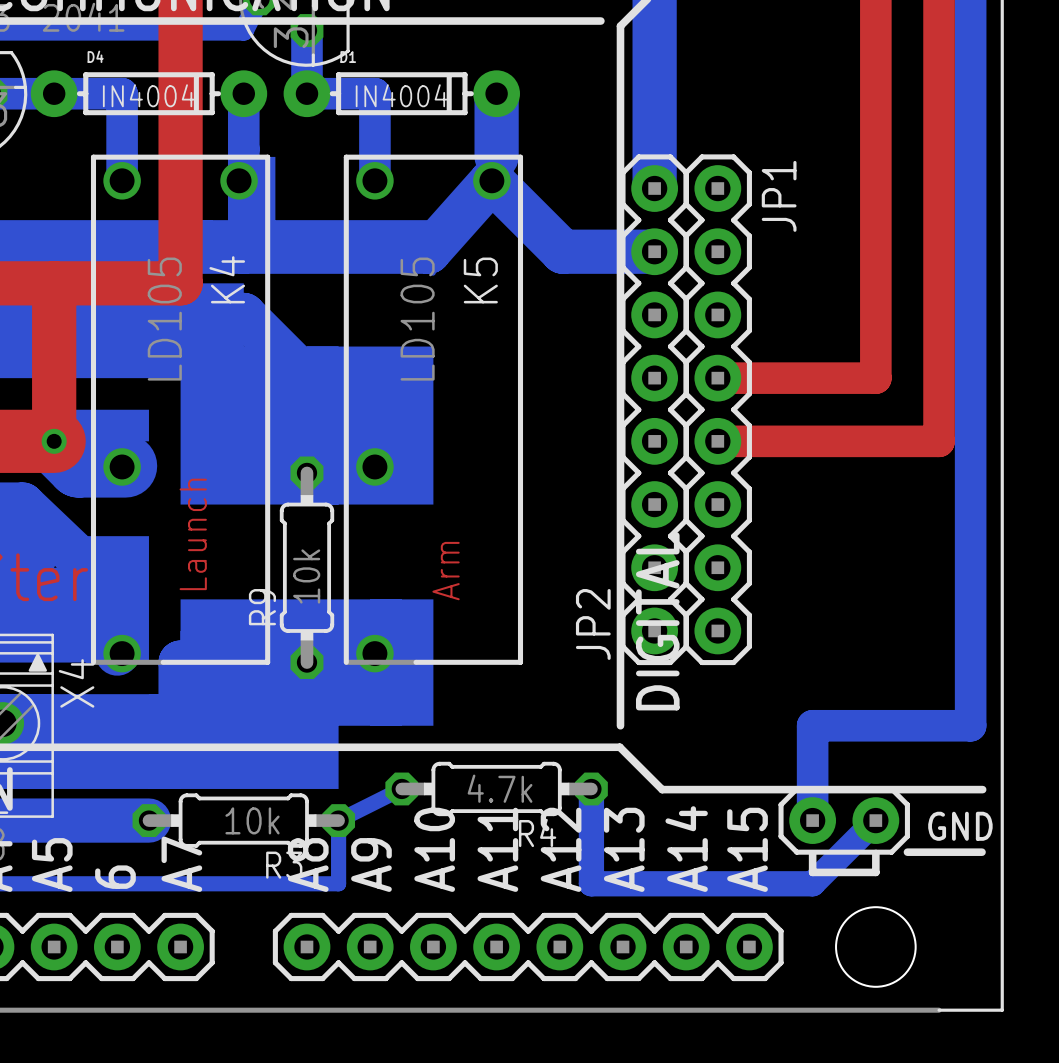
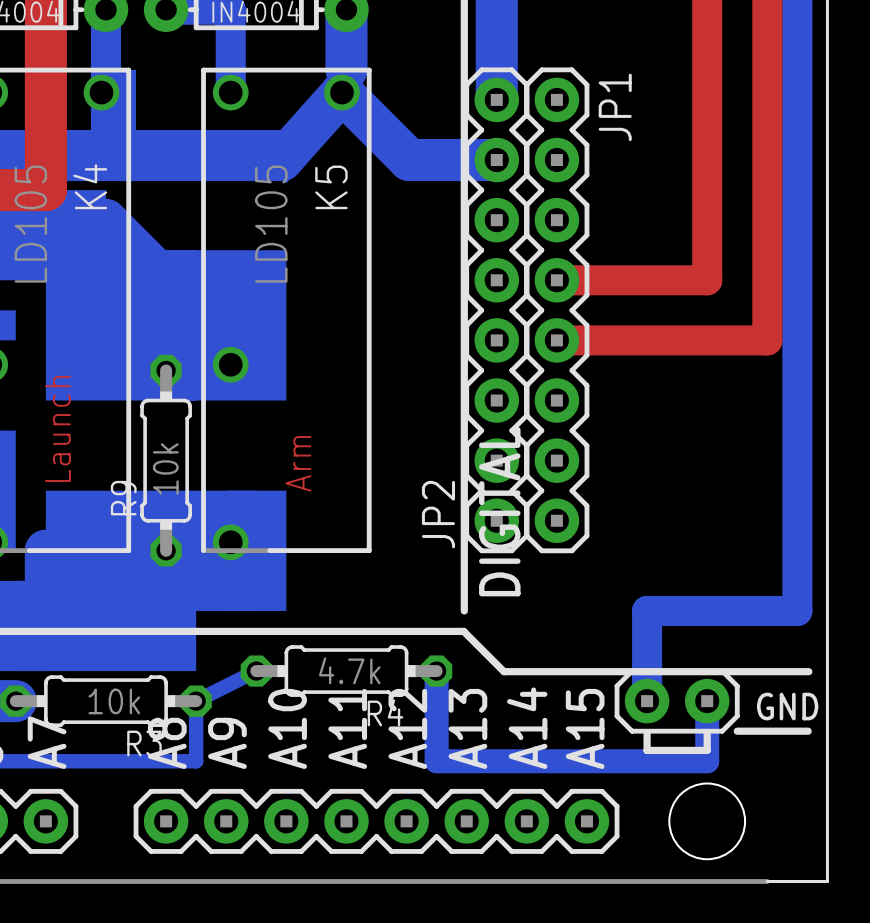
bottom track: (875, 820) (812, 883) -> (707, 701) (707, 761) (647, 761)

